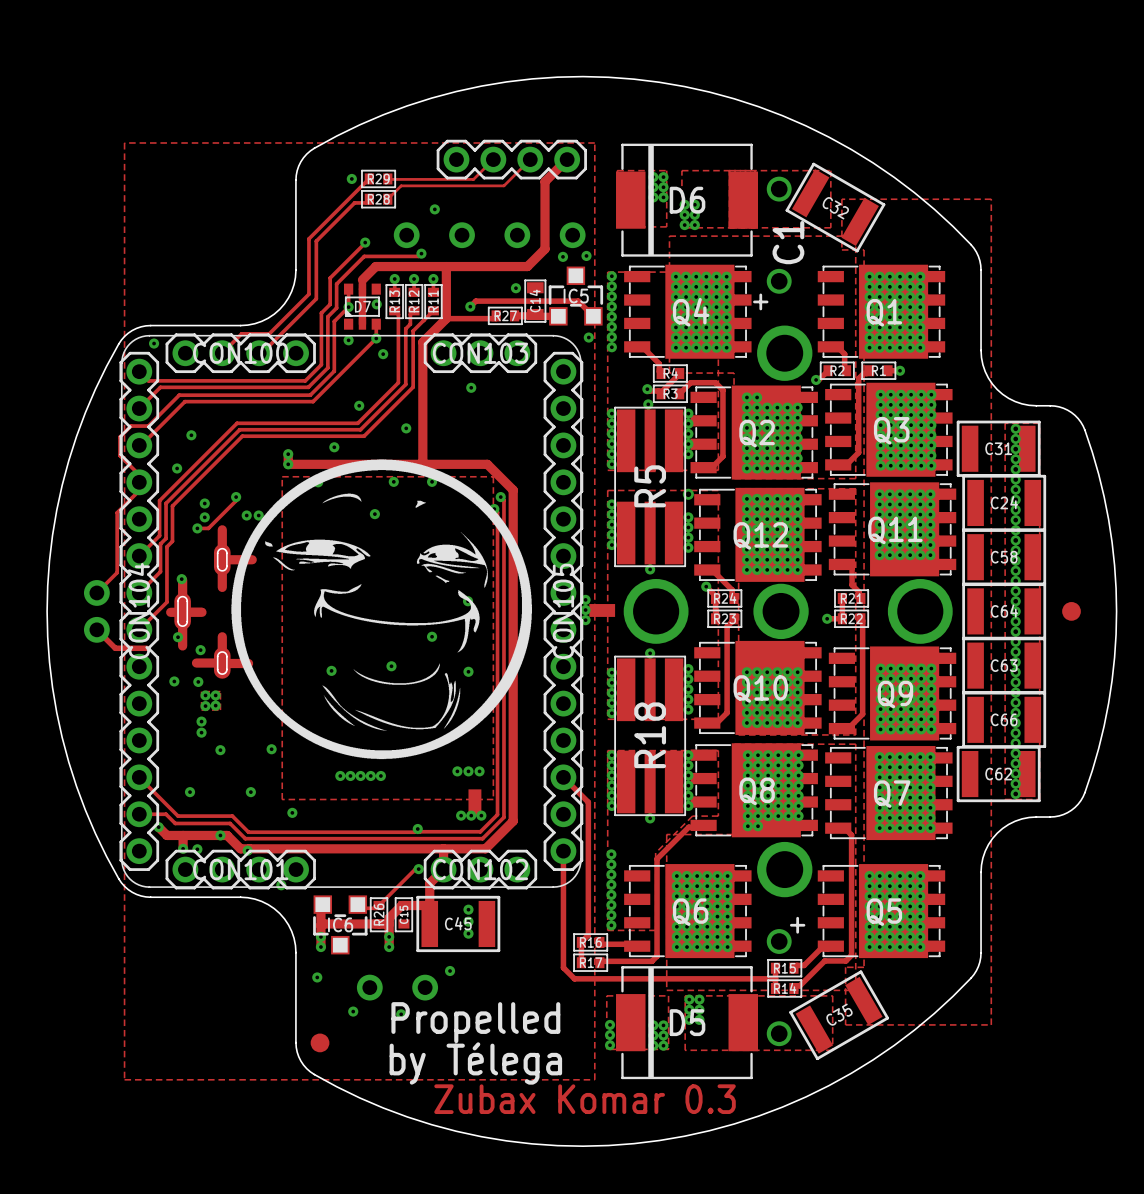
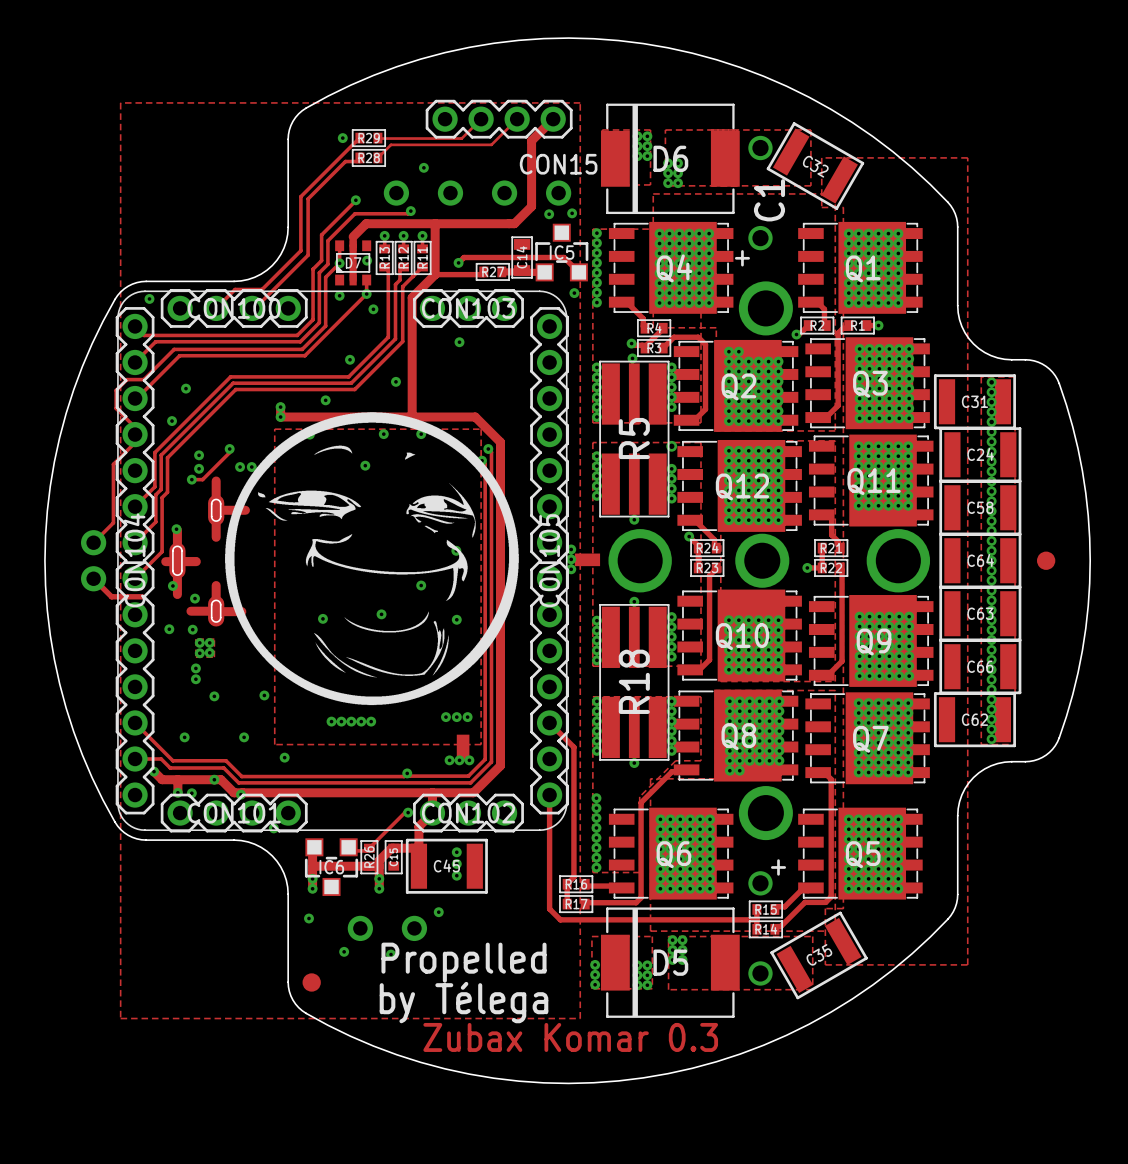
CON15 name: none -> CON15 (558, 164)
via: (515, 288) -> none

